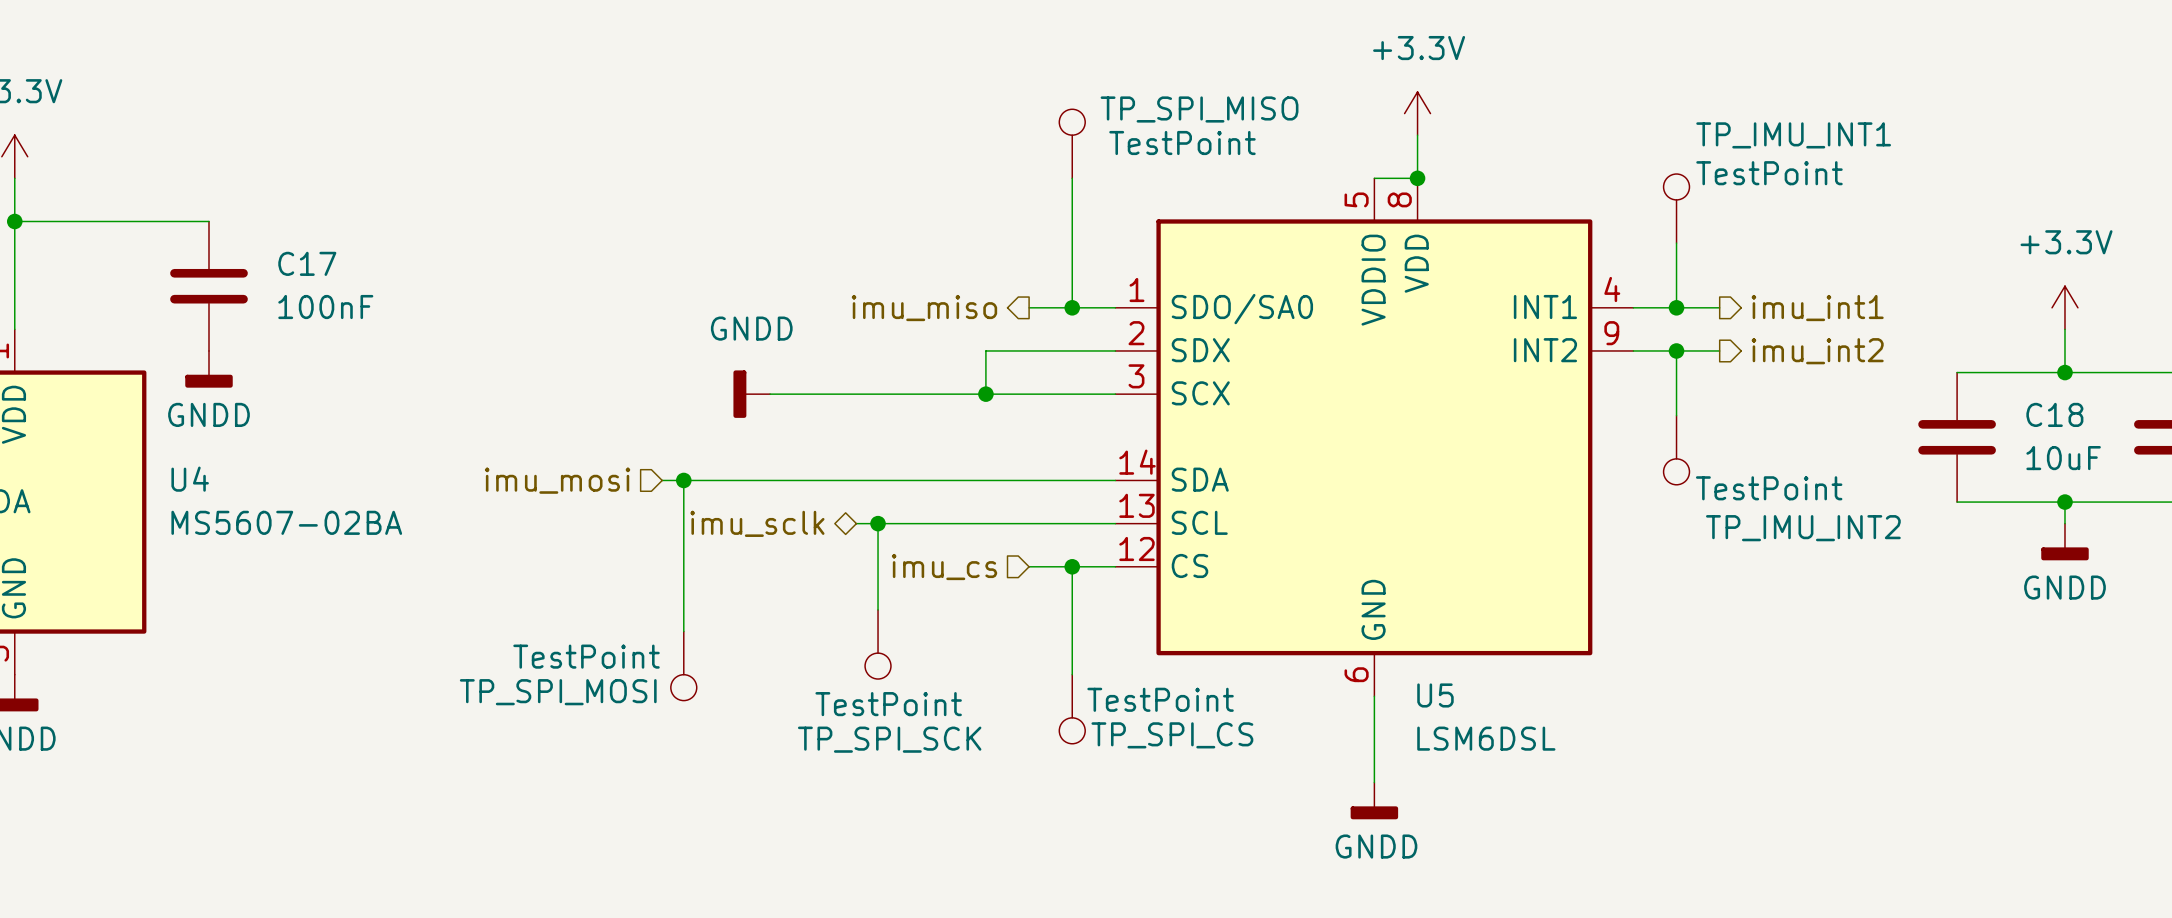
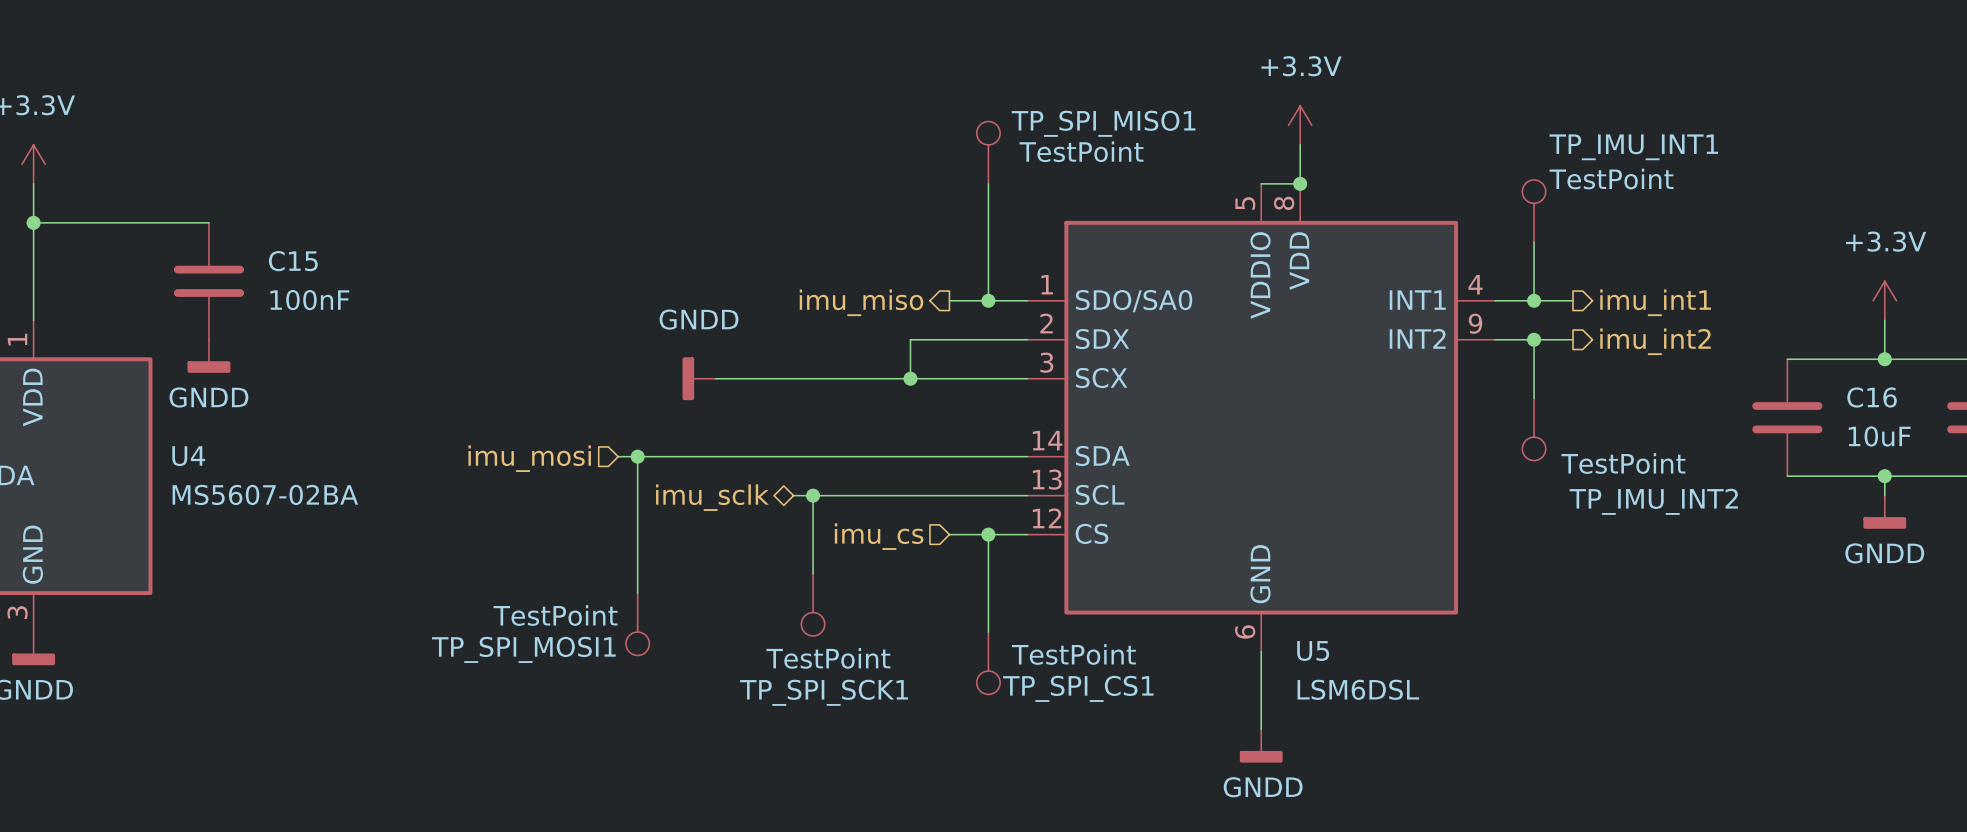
TP_SPI_MISO name: TP_SPI_MISO (1199, 109) -> TP_SPI_MISO1 (1103, 123)
C17 name: C17 (307, 263) -> C15 (293, 261)
C18 name: C18 (2054, 414) -> C16 (1872, 397)
TP_SPI_MOSI name: TP_SPI_MOSI (558, 692) -> TP_SPI_MOSI1 (523, 649)
TP_SPI_CS name: TP_SPI_CS (1172, 735) -> TP_SPI_CS1 (1078, 688)
TP_SPI_SCK name: TP_SPI_SCK (889, 739) -> TP_SPI_SCK1 (824, 692)

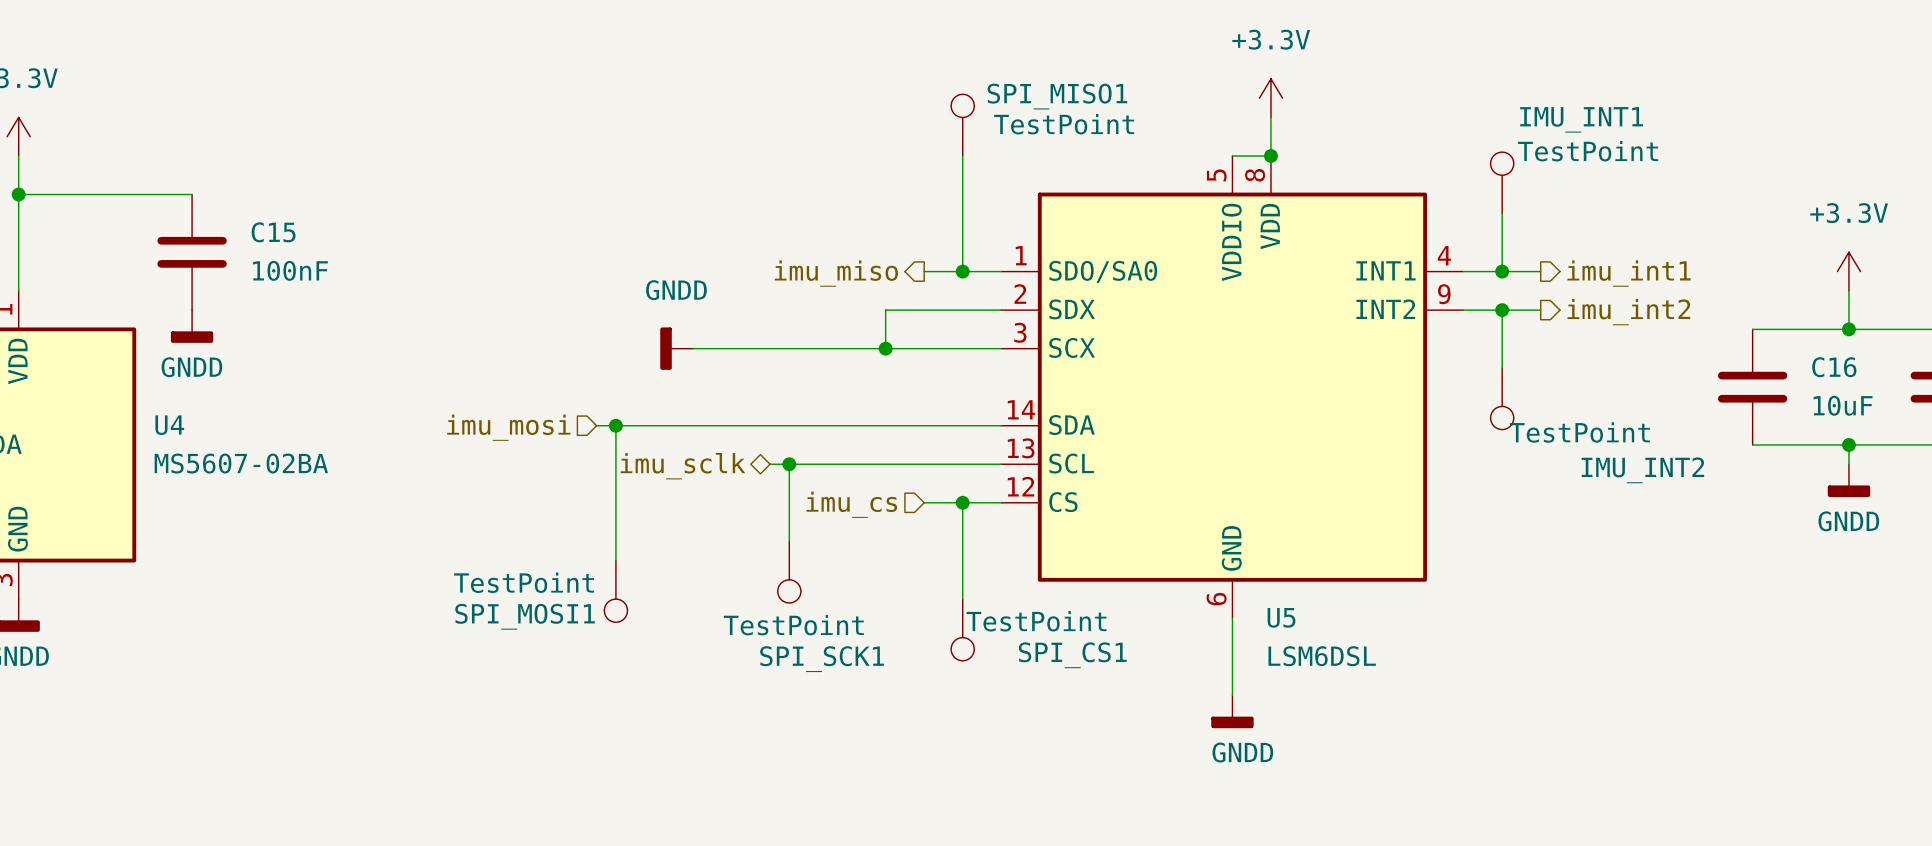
TP_SPI_MISO1 name: TP_SPI_MISO1 (1103, 123) -> SPI_MISO1 (1057, 96)
TP_IMU_INT1 name: TP_IMU_INT1 (1633, 147) -> IMU_INT1 (1581, 119)
TP_IMU_INT2 name: TP_IMU_INT2 (1653, 501) -> IMU_INT2 (1642, 470)
TP_SPI_MOSI1 name: TP_SPI_MOSI1 (523, 649) -> SPI_MOSI1 (525, 616)
TP_SPI_CS1 name: TP_SPI_CS1 (1078, 688) -> SPI_CS1 (1072, 655)
TP_SPI_SCK1 name: TP_SPI_SCK1 (824, 692) -> SPI_SCK1 (822, 659)

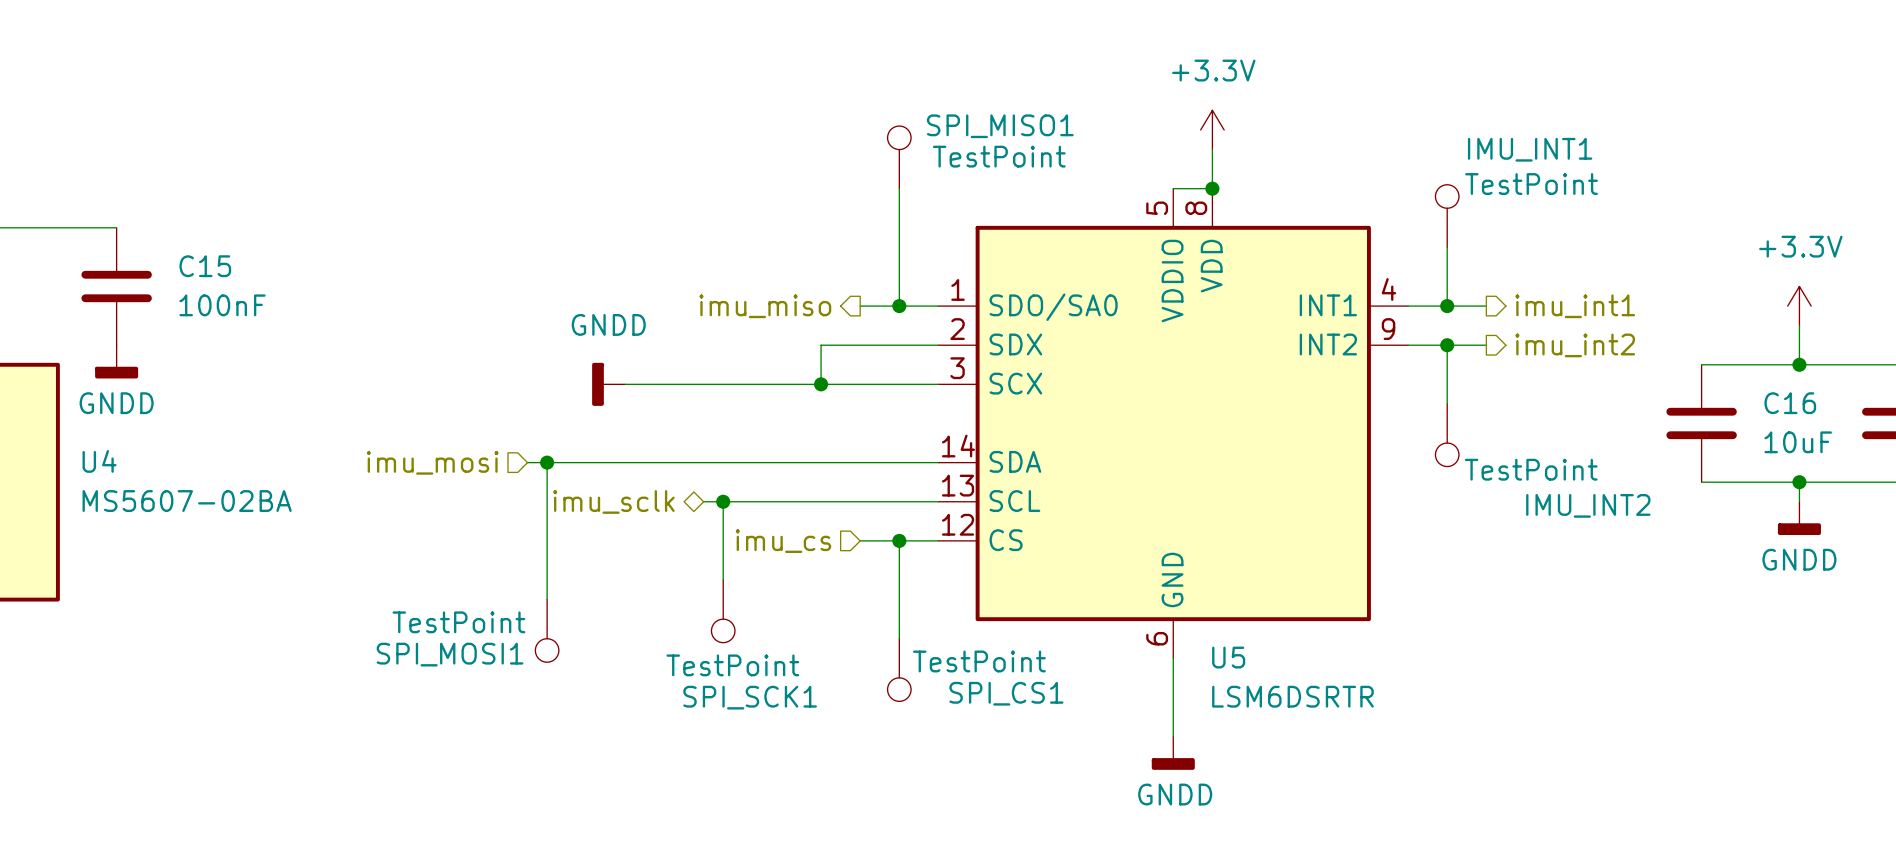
U5 value: LSM6DSL (1322, 656) -> LSM6DSRTR (1292, 696)

